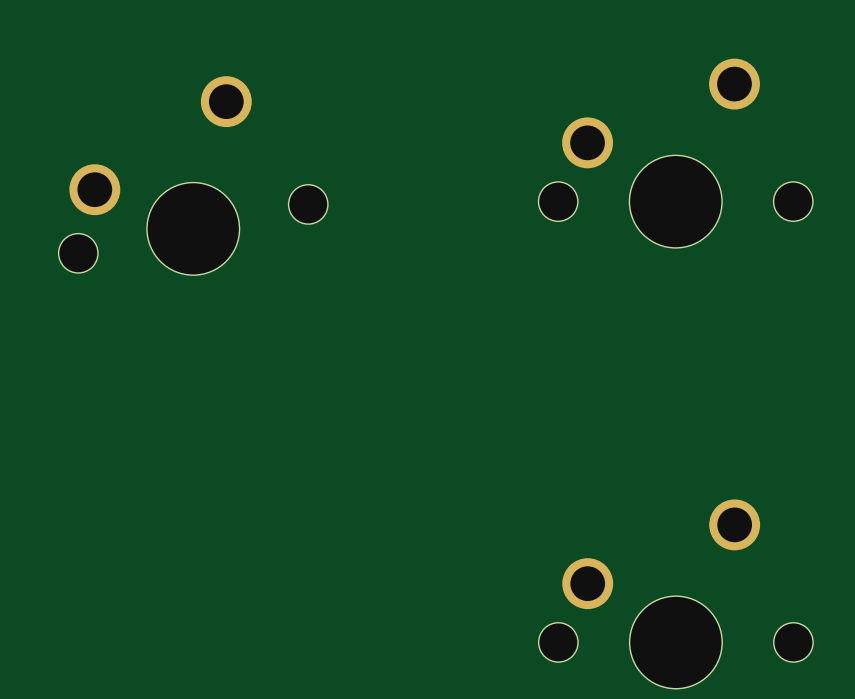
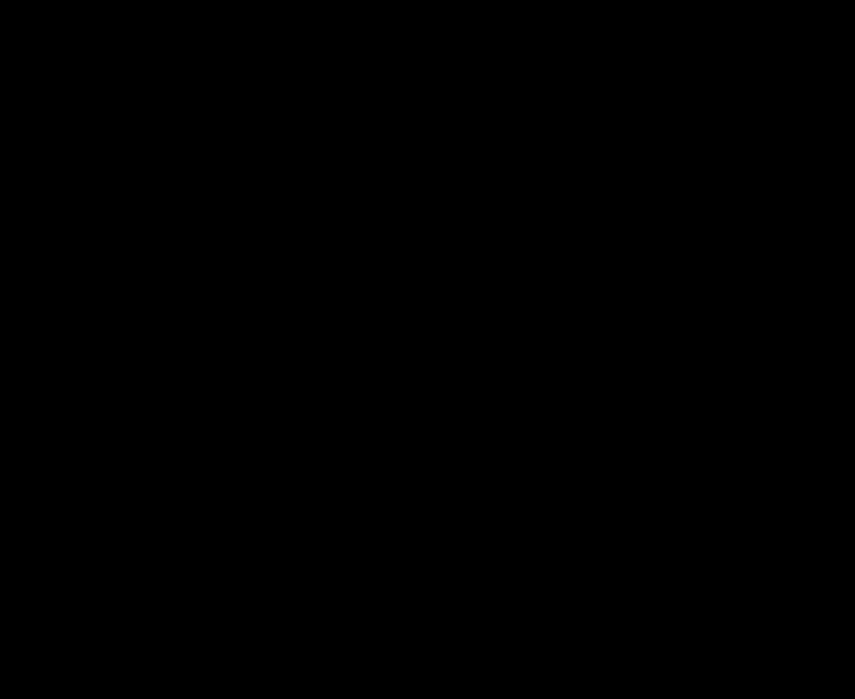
part: (675, 153) -> none
part: (193, 175) -> none
part: (675, 594) -> none

